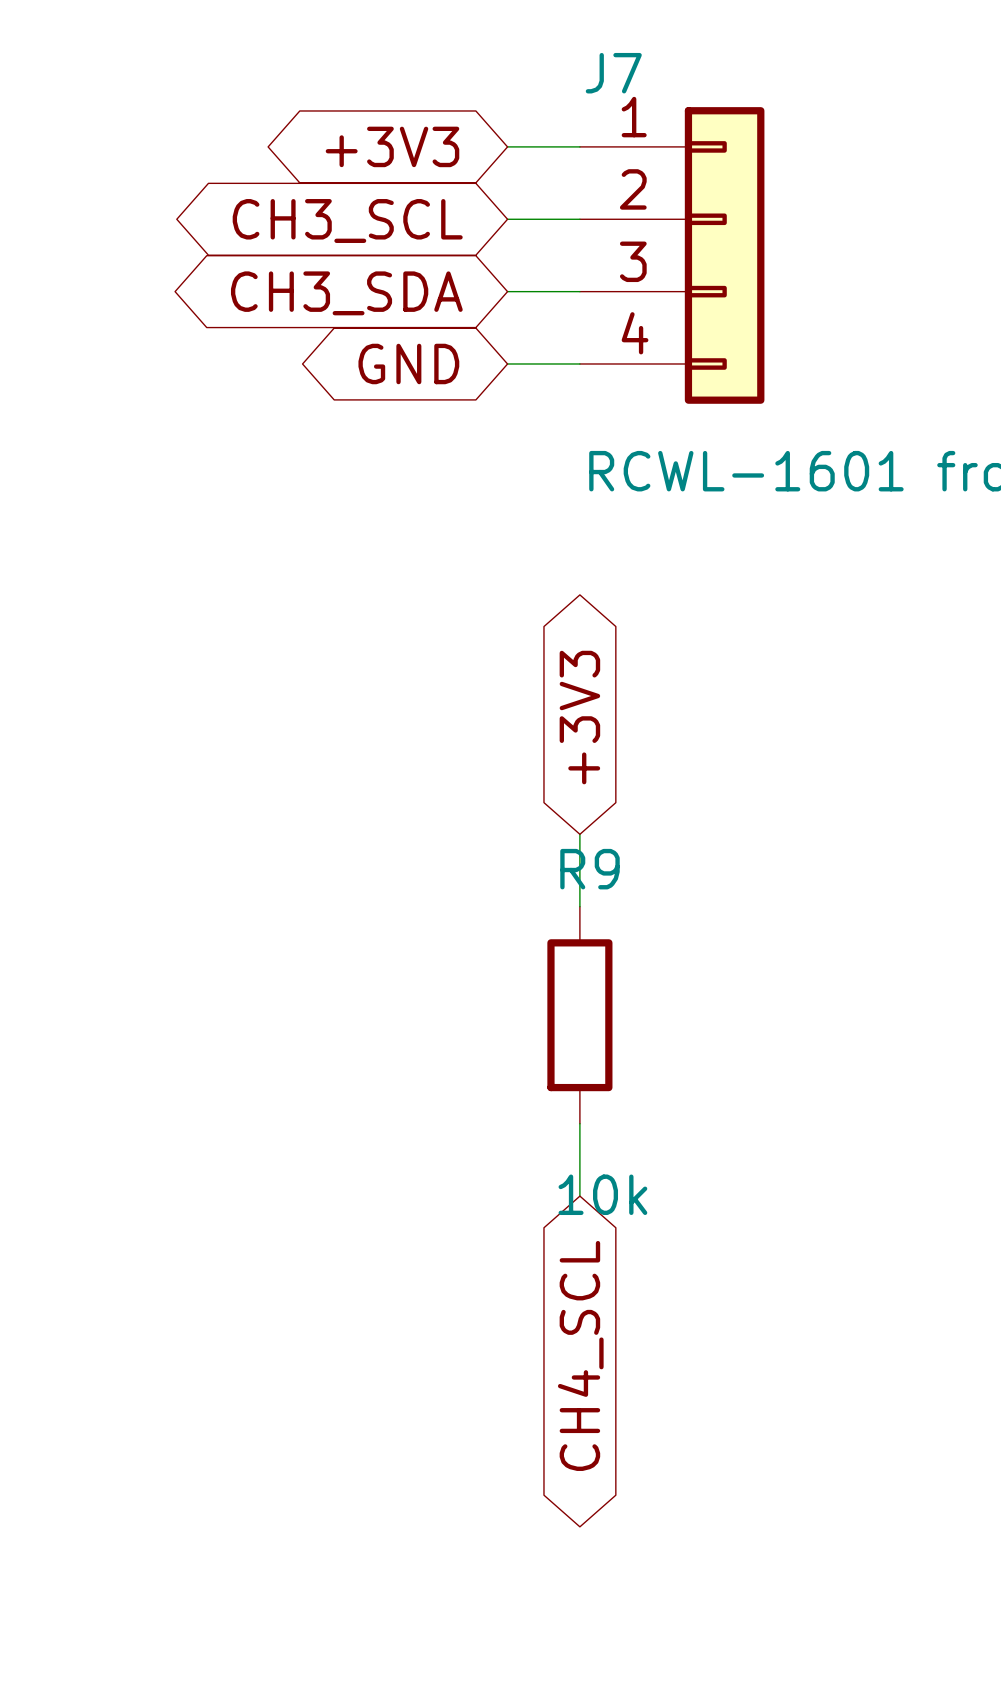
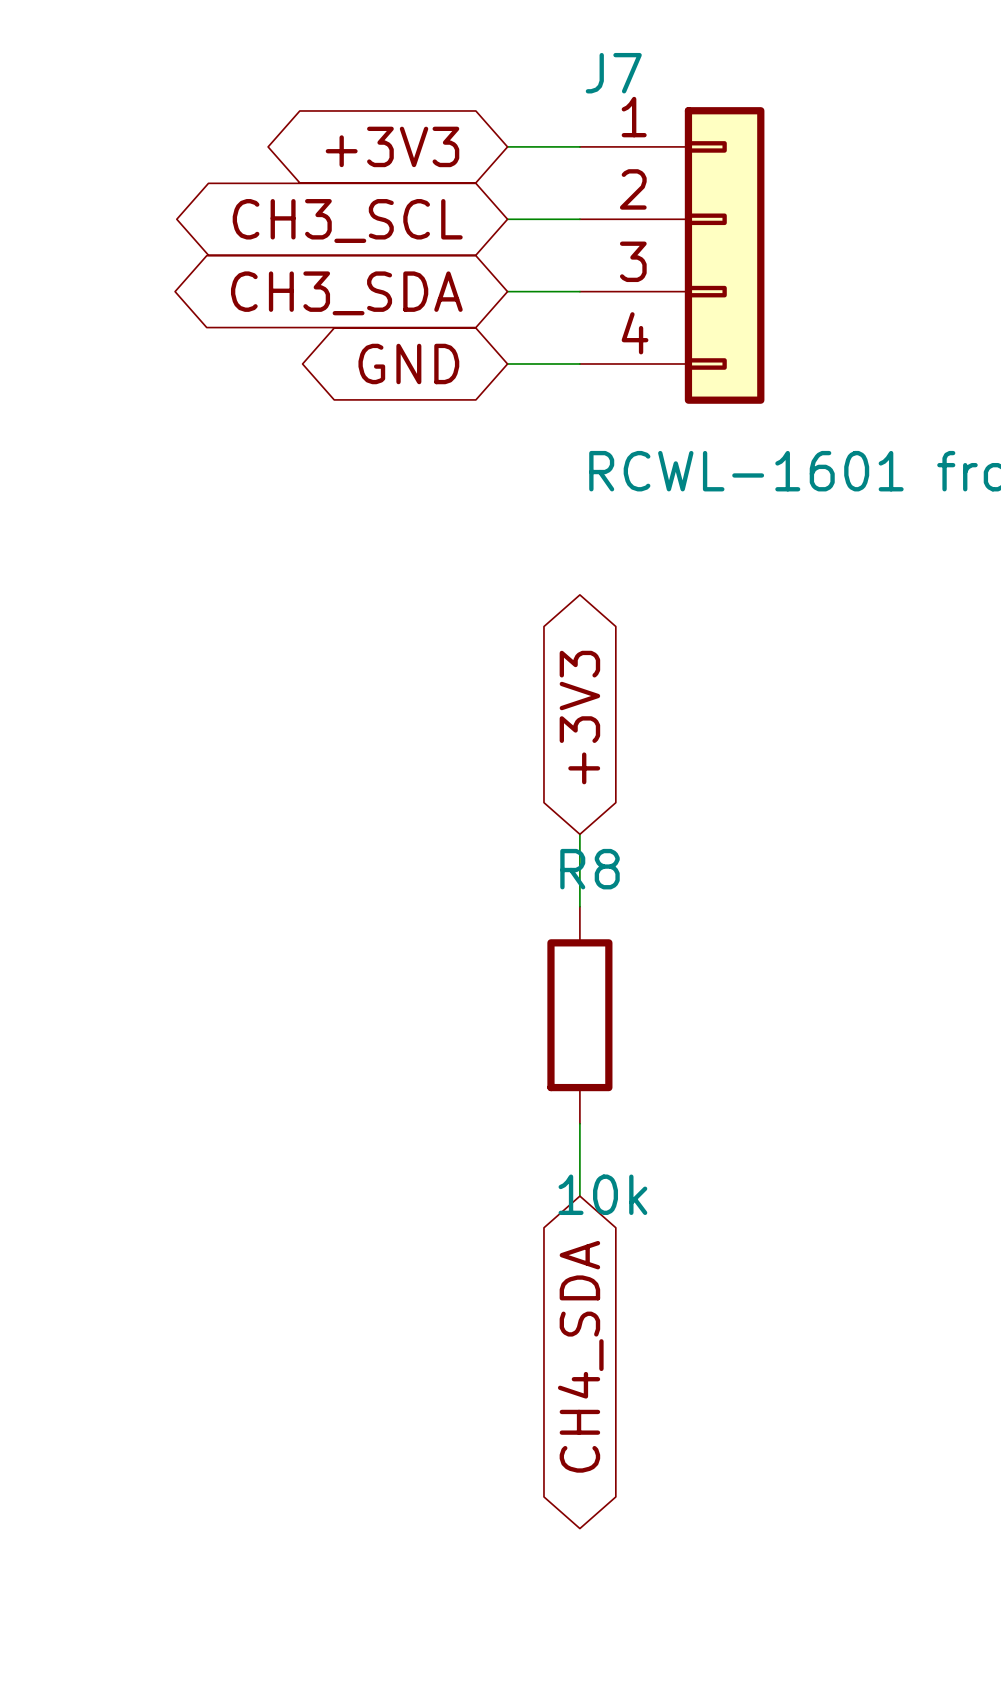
R9 name: R9 (590, 869) -> R8 (590, 869)
global label: CH4_SCL (580, 1355) -> CH4_SDA (580, 1356)

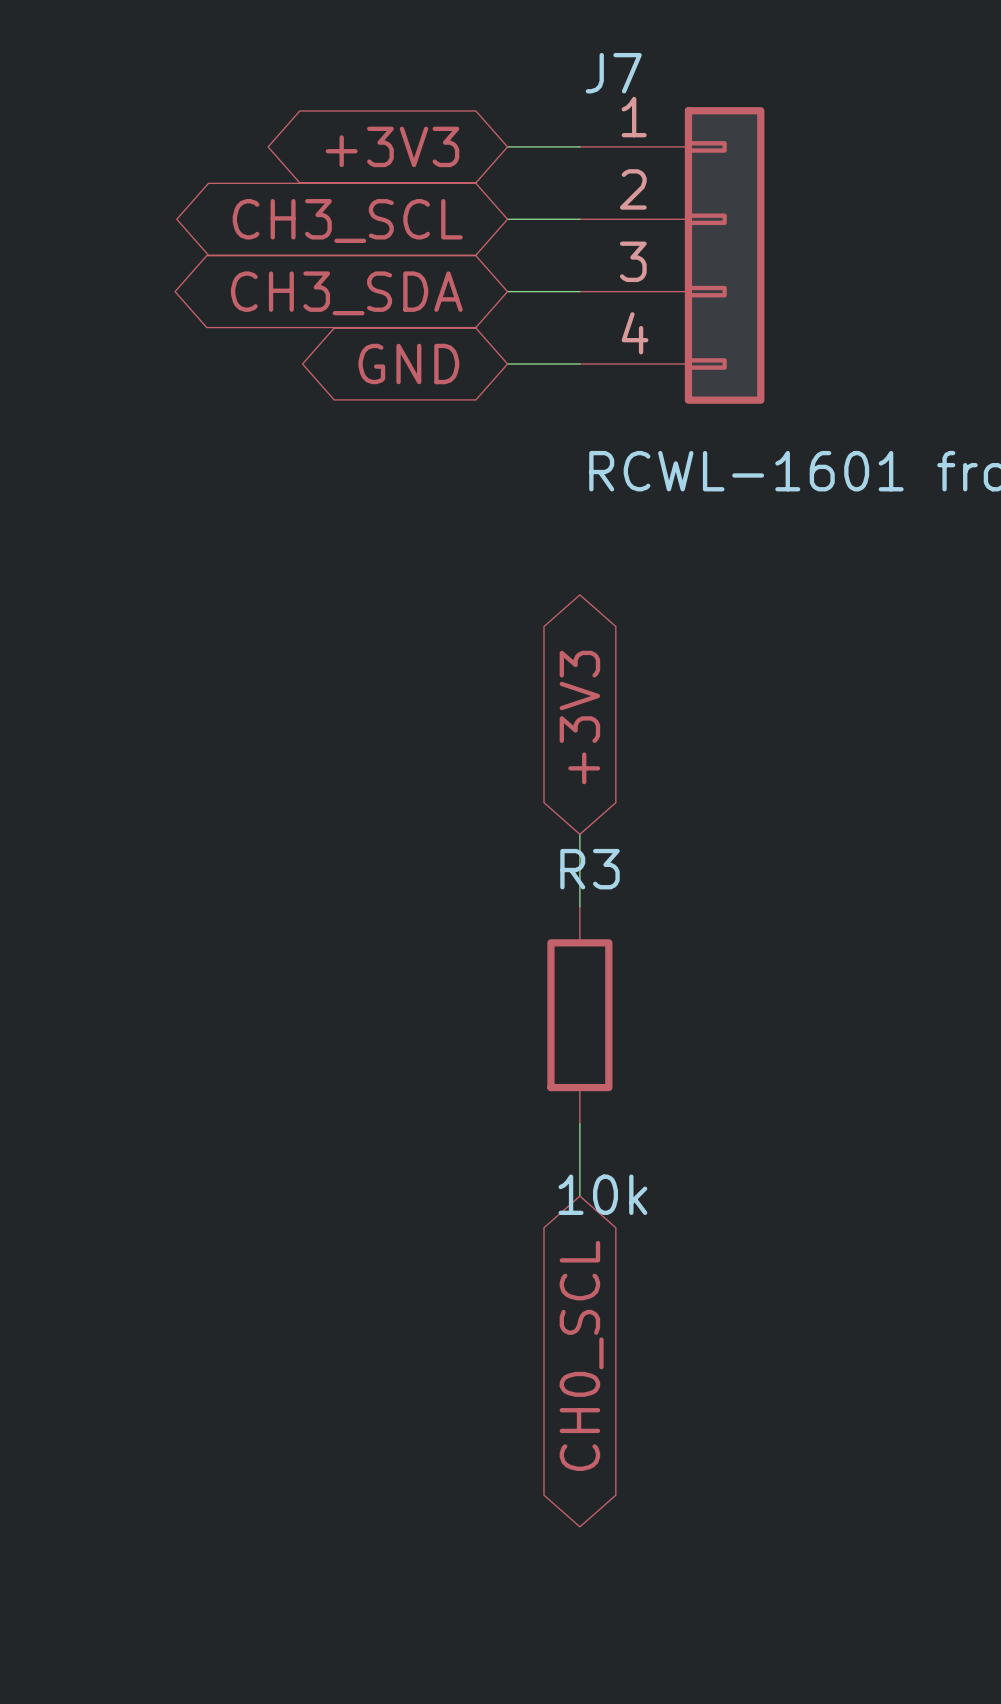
R8 name: R8 (590, 869) -> R3 (590, 869)
global label: CH4_SDA (580, 1356) -> CH0_SCL (581, 1355)

